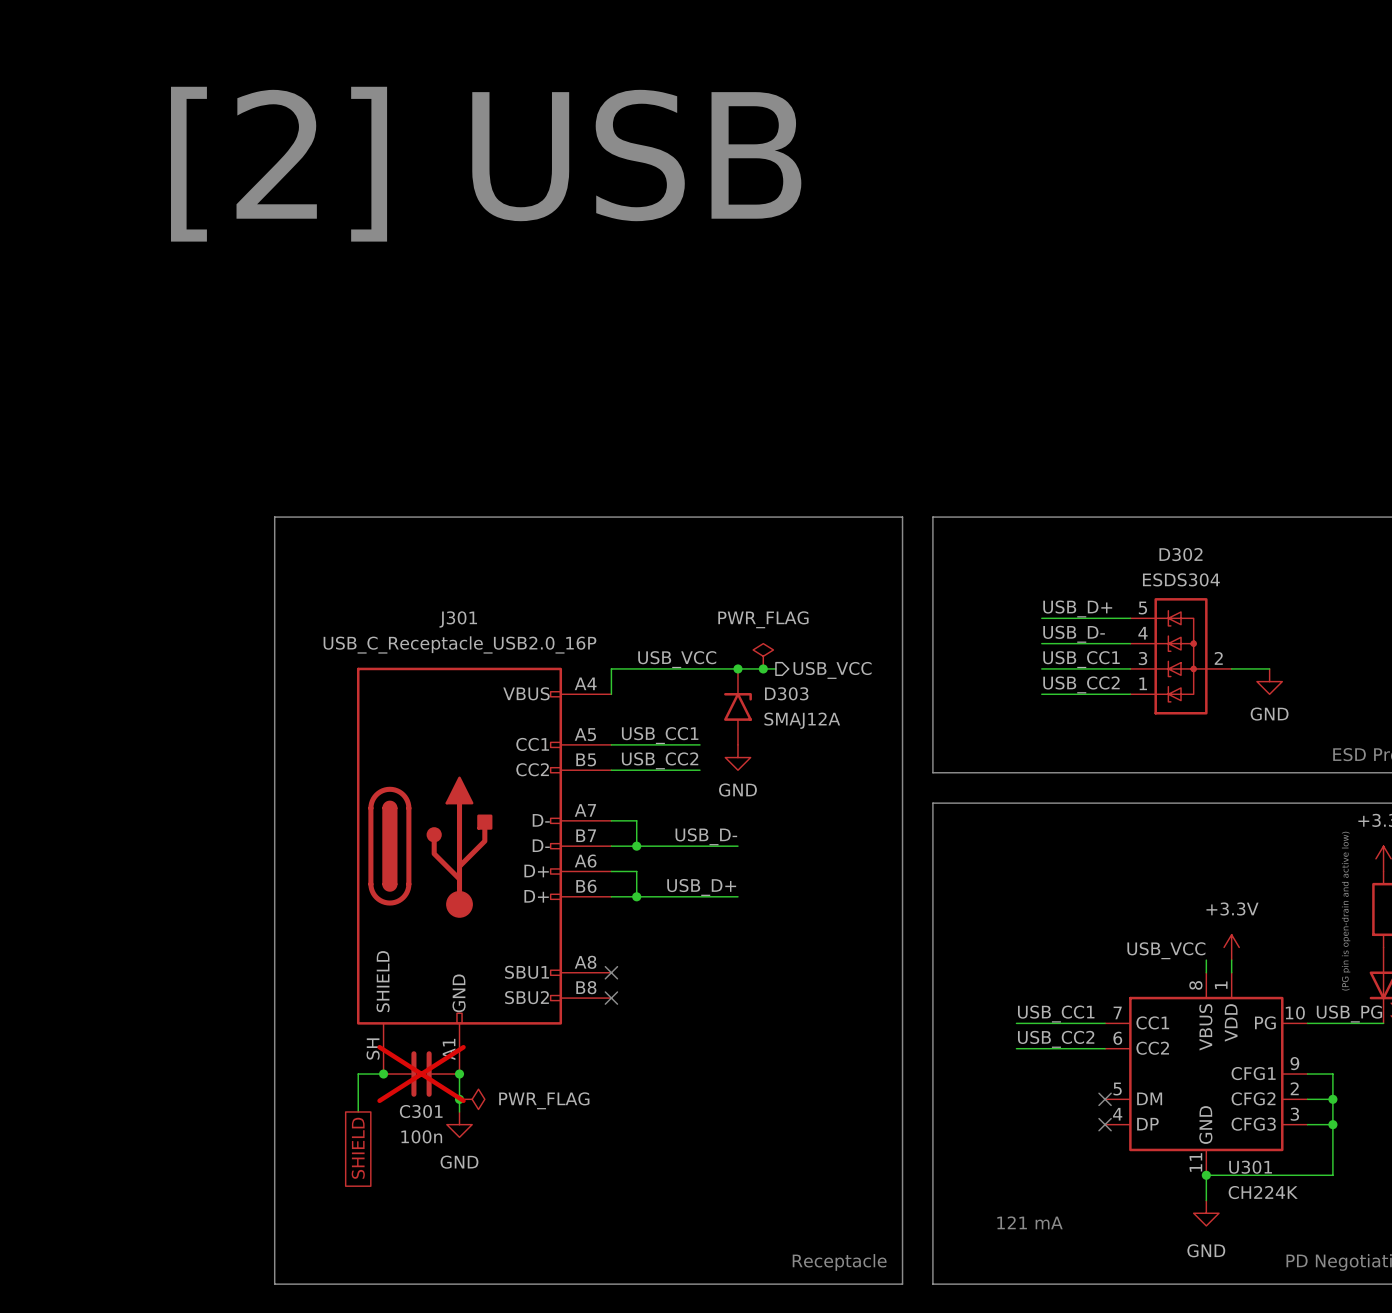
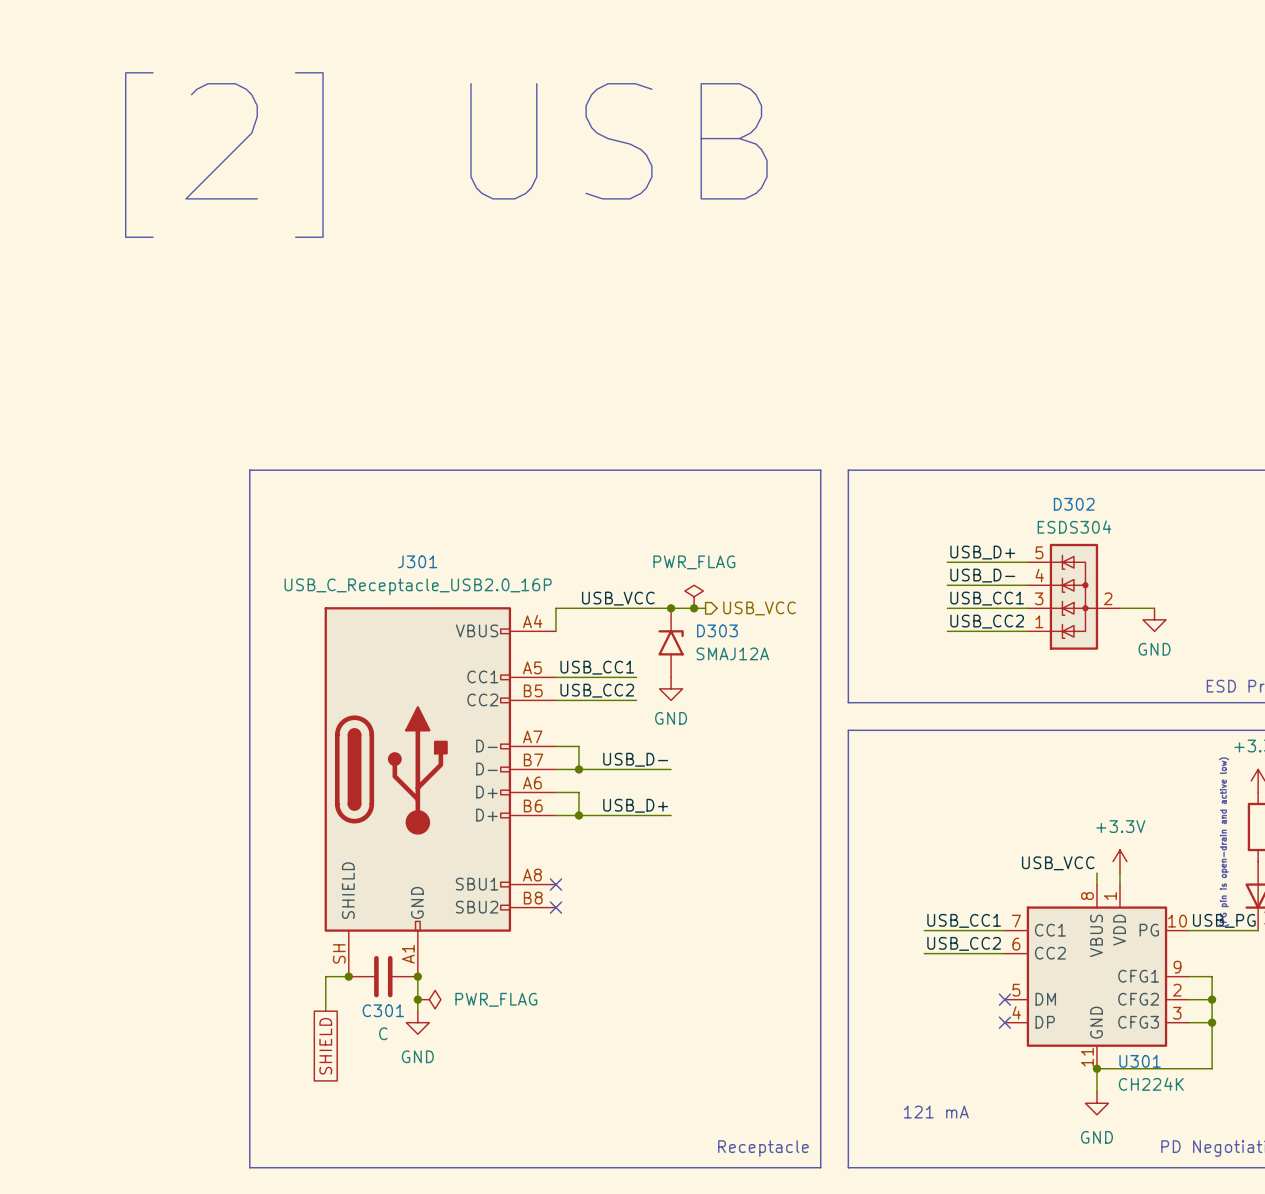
C301 do-not-place cross: (421, 1074) -> none
C301 value: 100n (421, 1136) -> C (383, 1033)

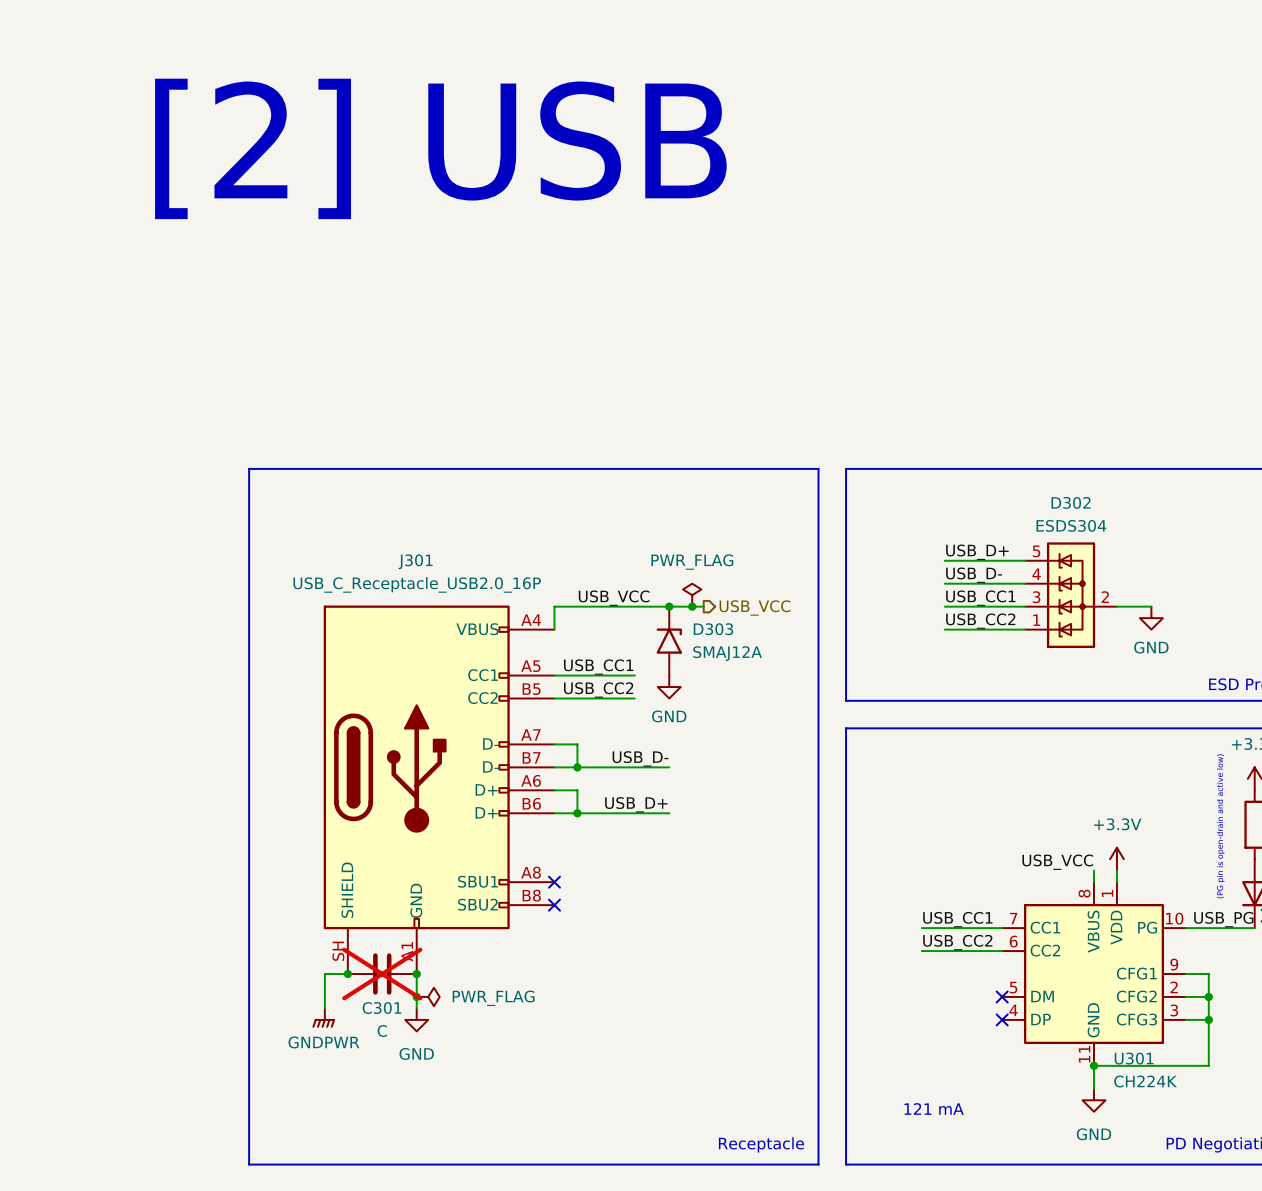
C301 do-not-place cross: none -> (382, 974)
power symbol: none -> GNDPWR (323, 1018)
global label: SHIELD (325, 1046) -> none

